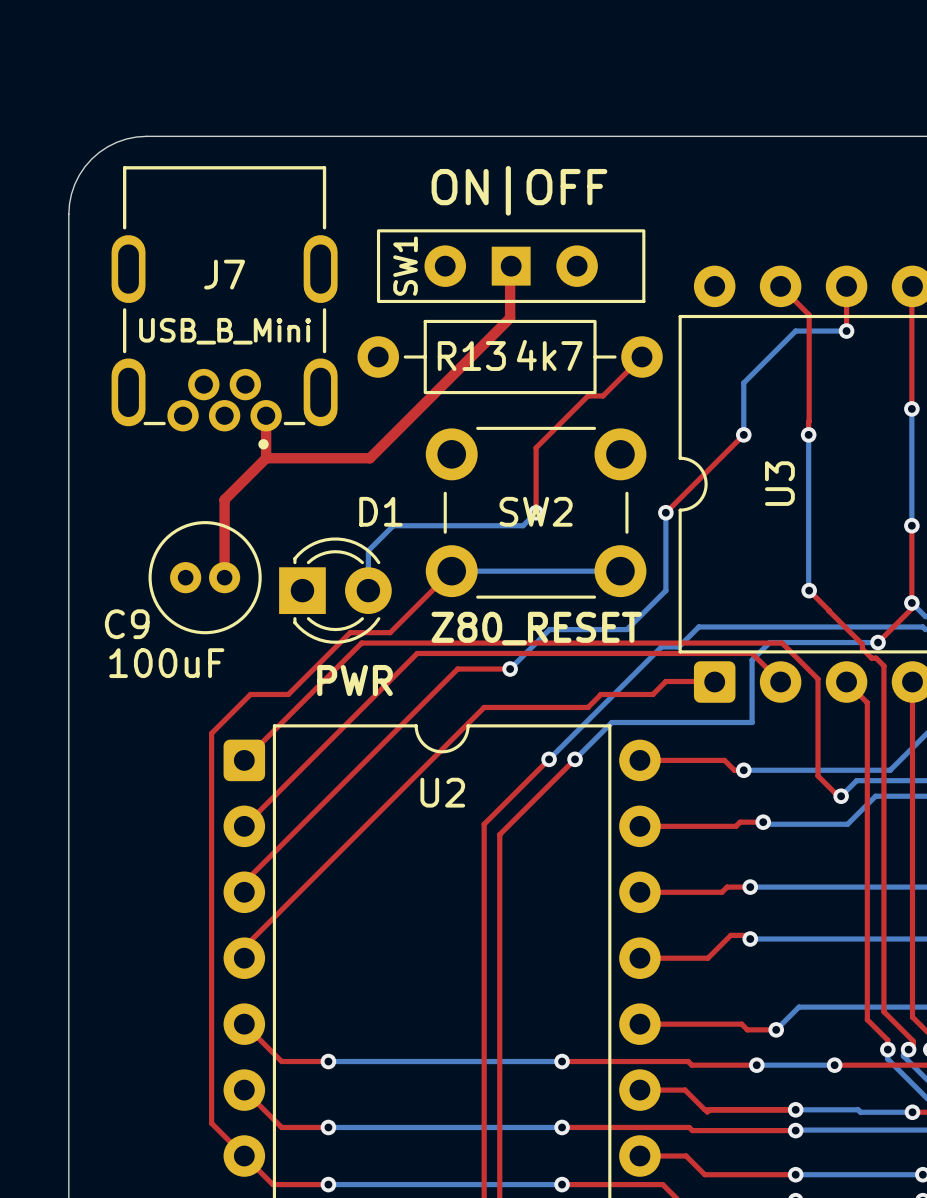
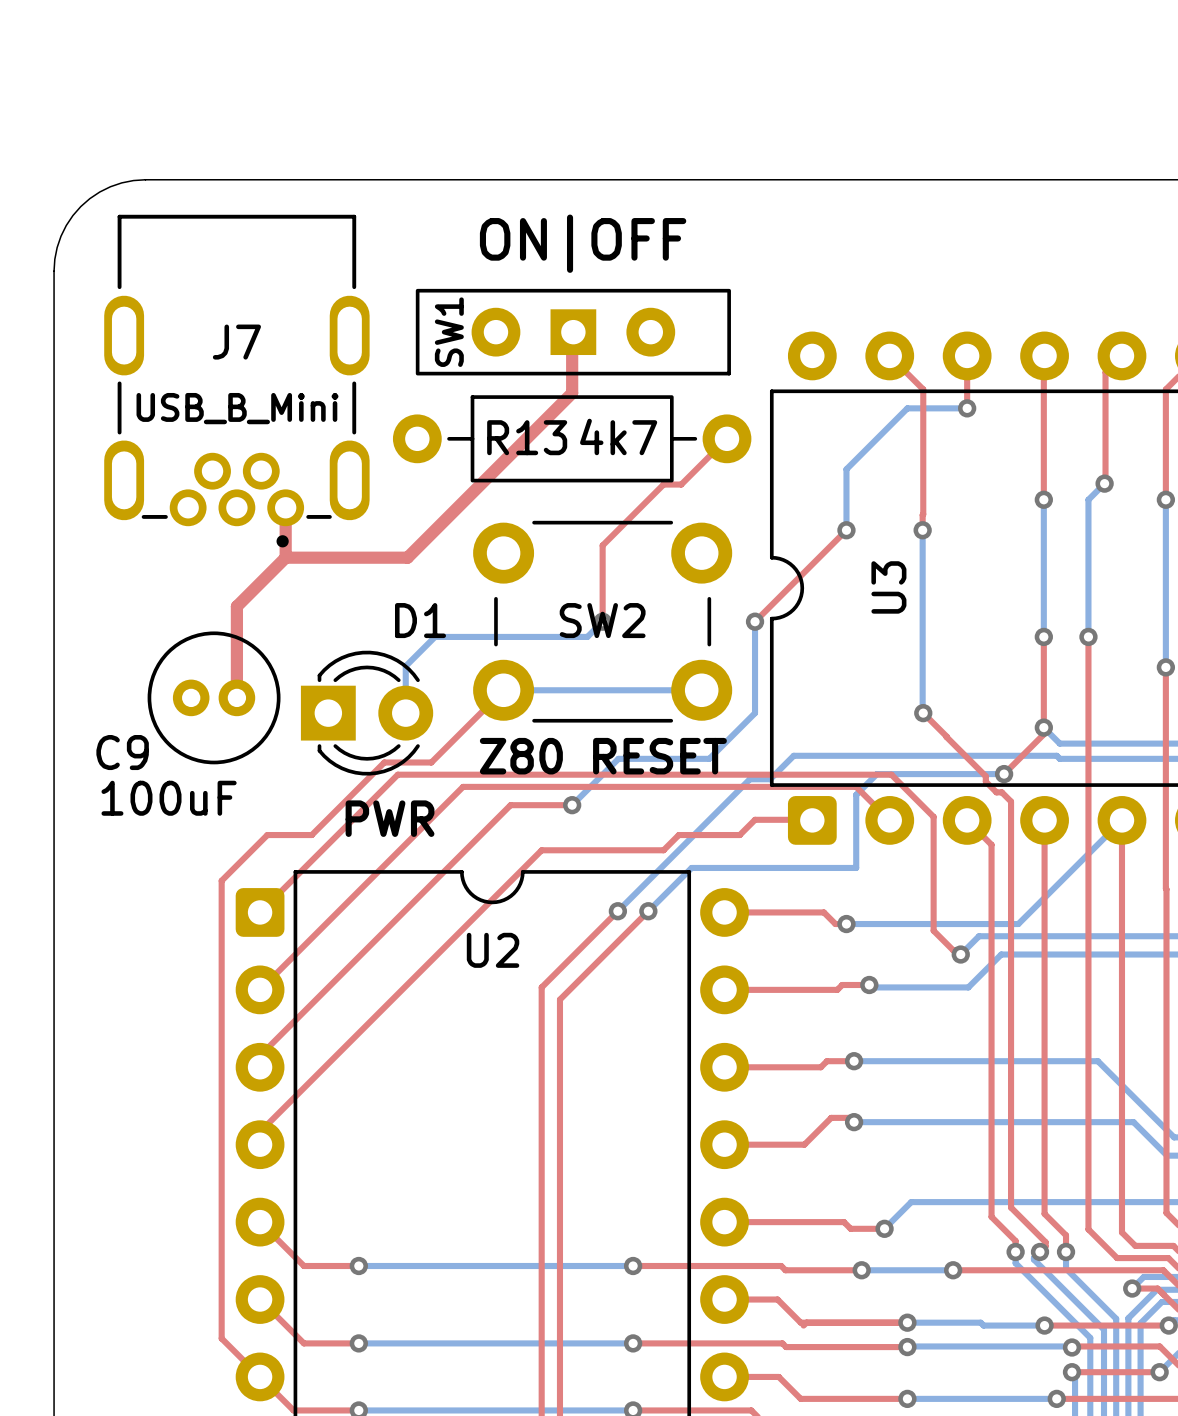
SW2 value: Z80_RESET (536, 628) -> Z80 RESET (603, 756)

